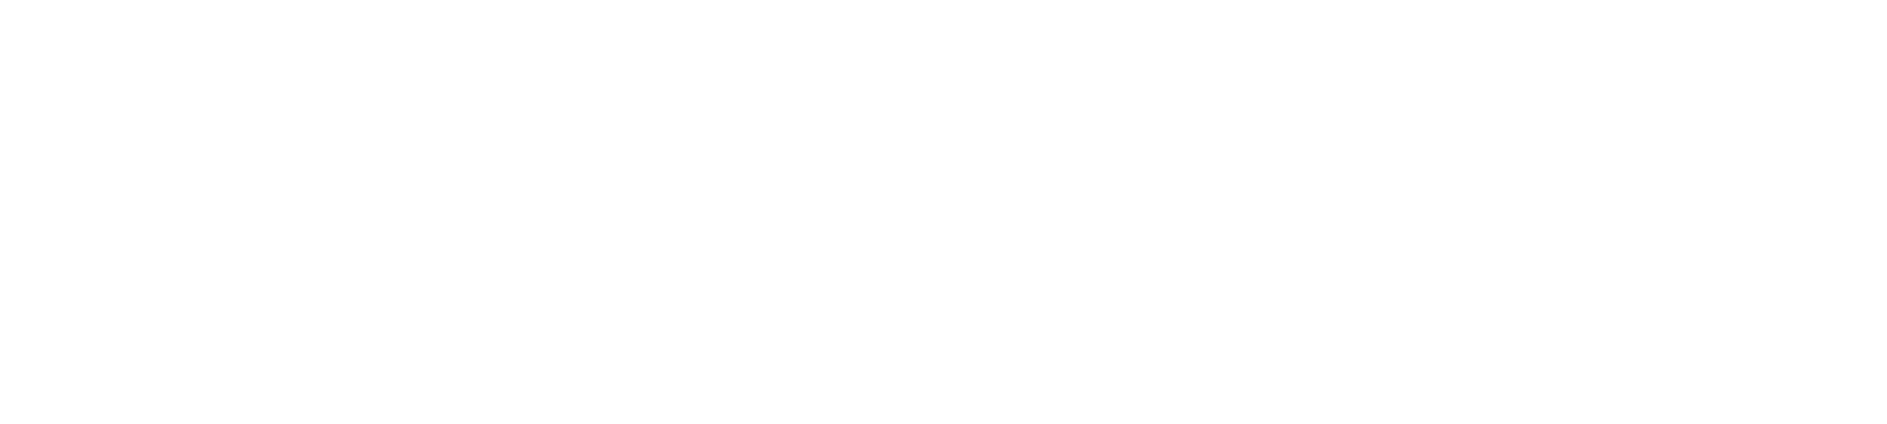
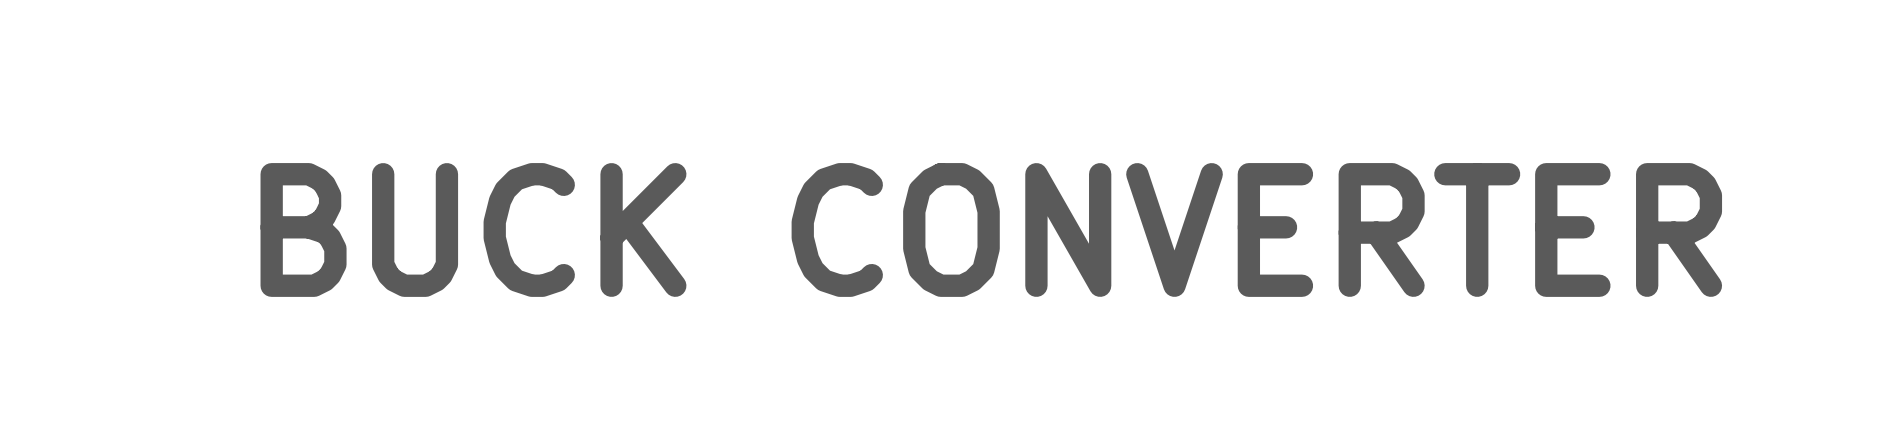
text: none -> BUCK CONVERTER (991, 229)

